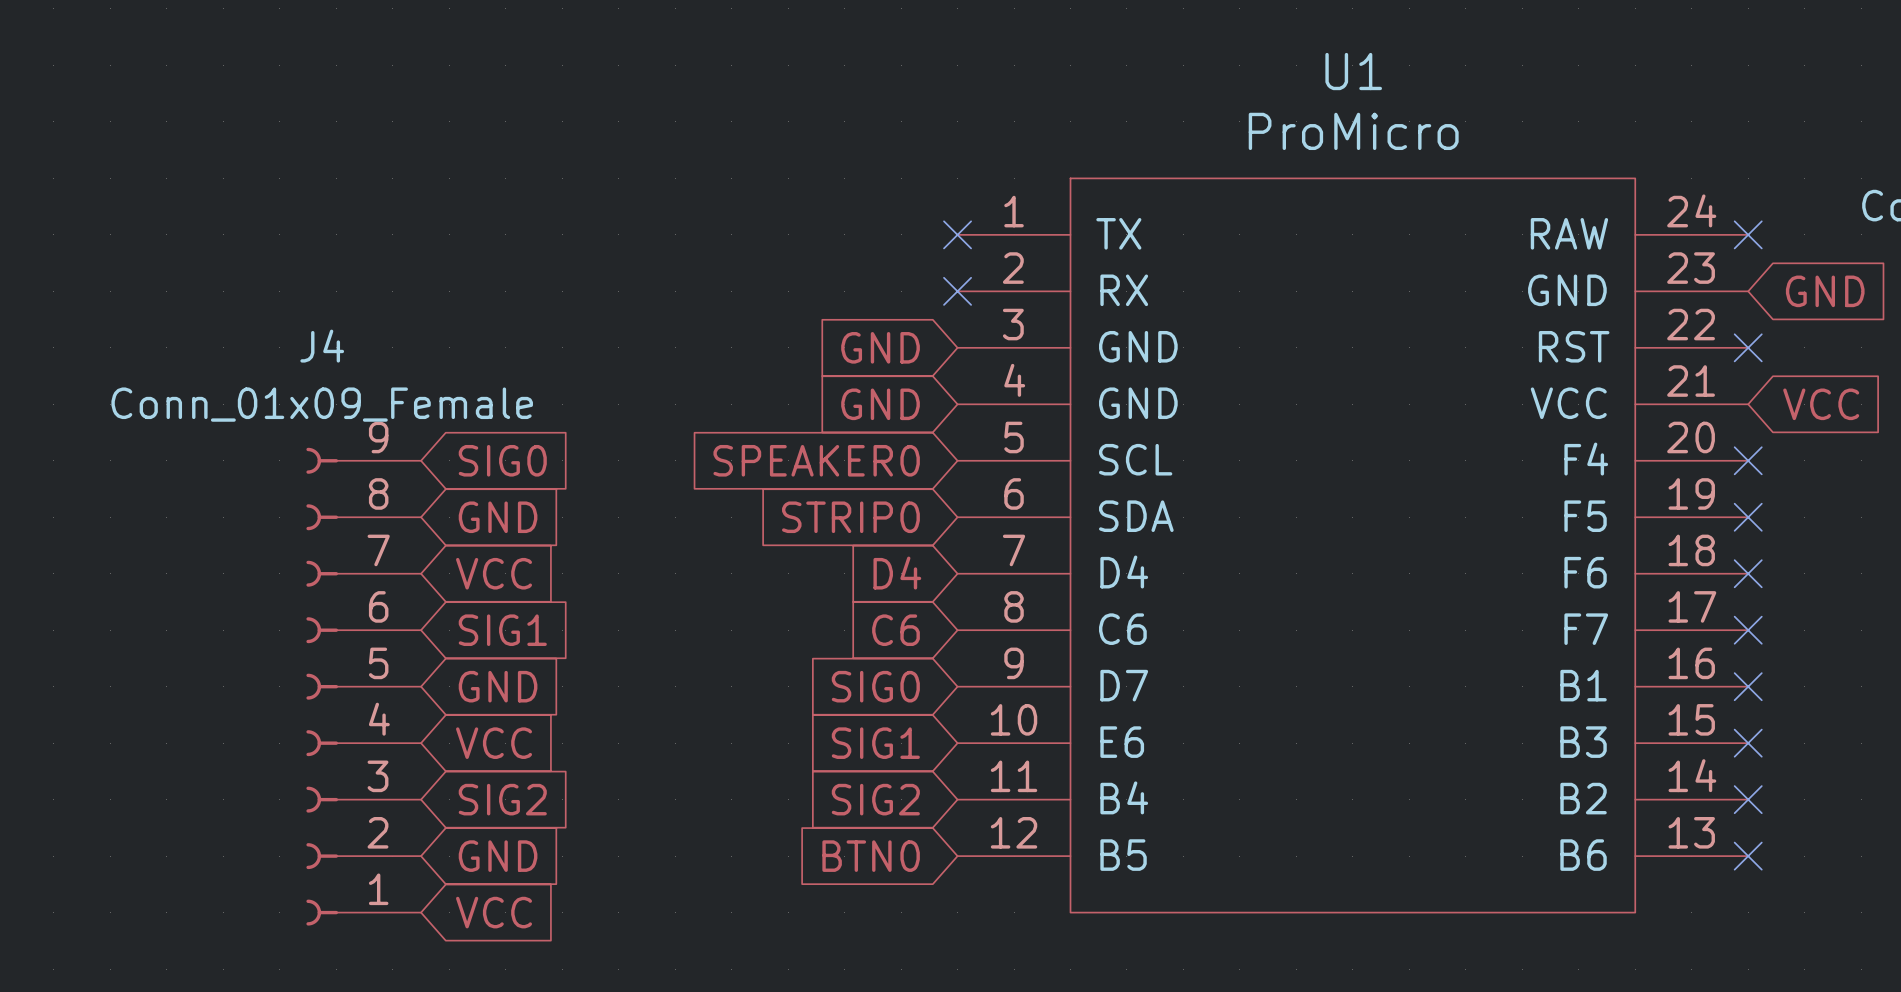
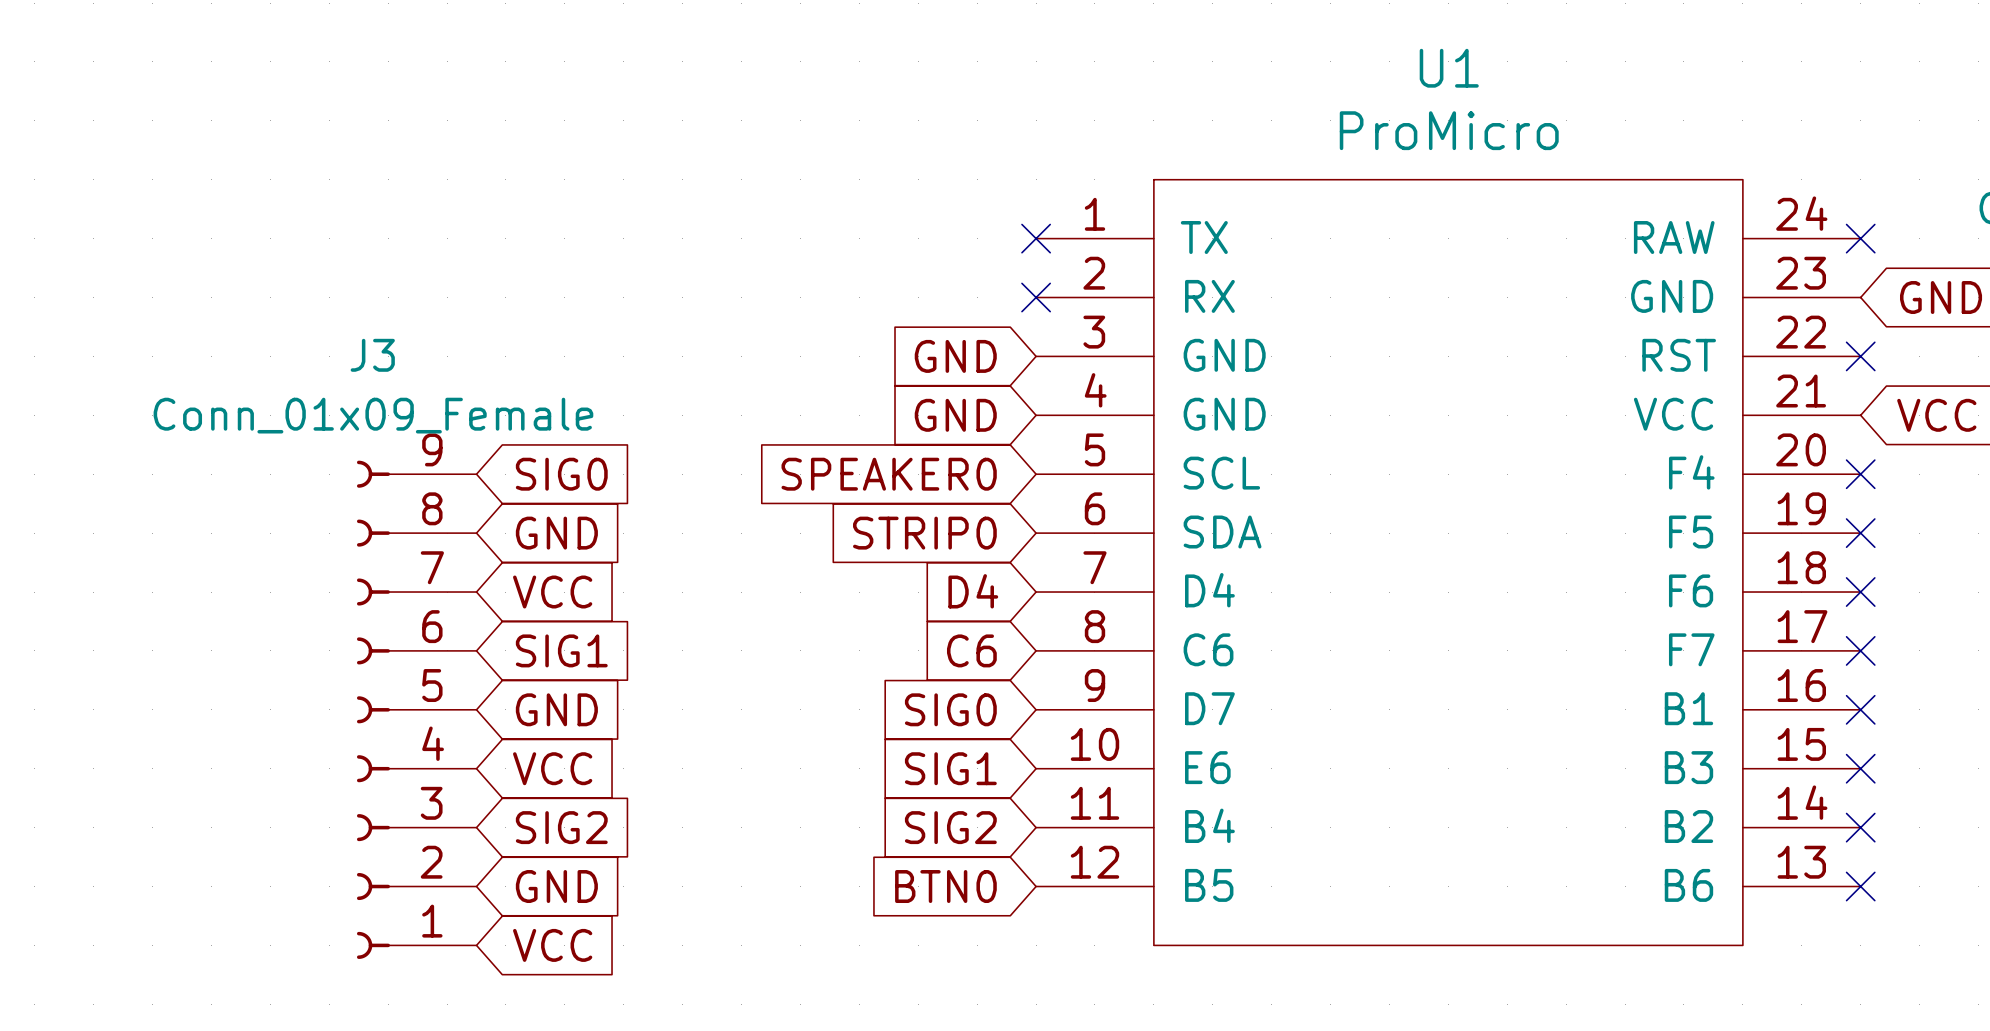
J4 name: J4 (322, 346) -> J3 (372, 355)

